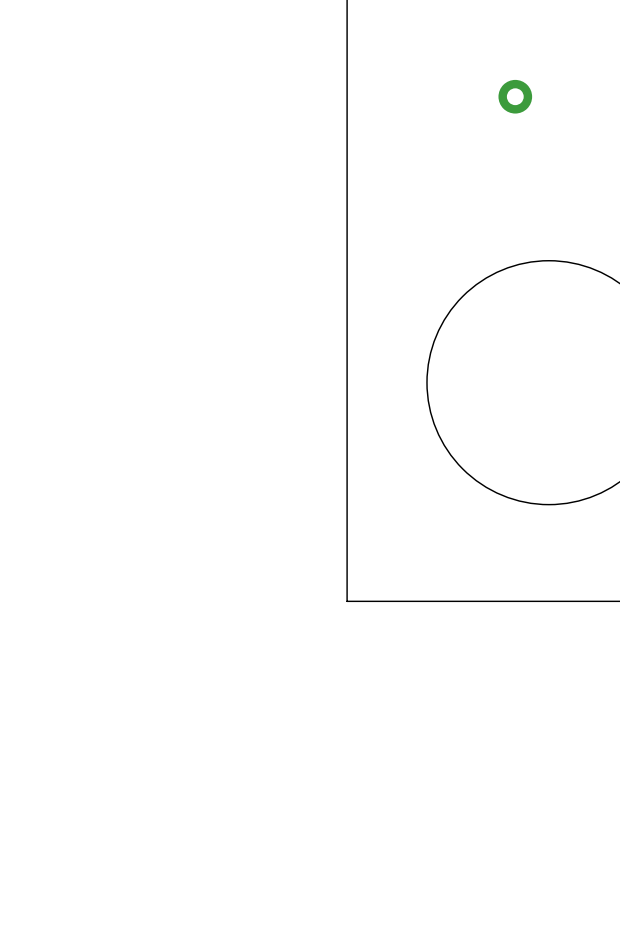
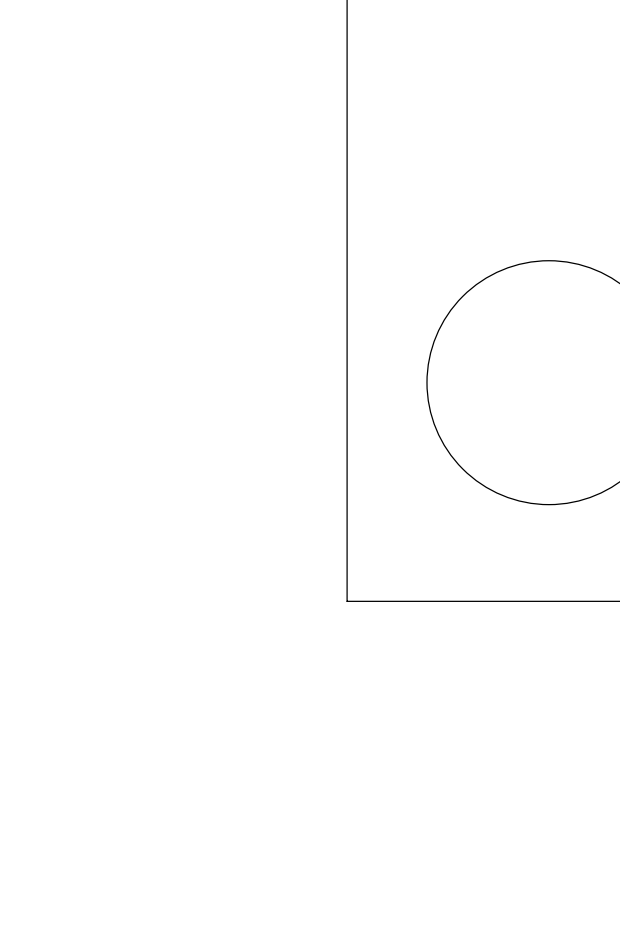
via: (515, 96) -> none

